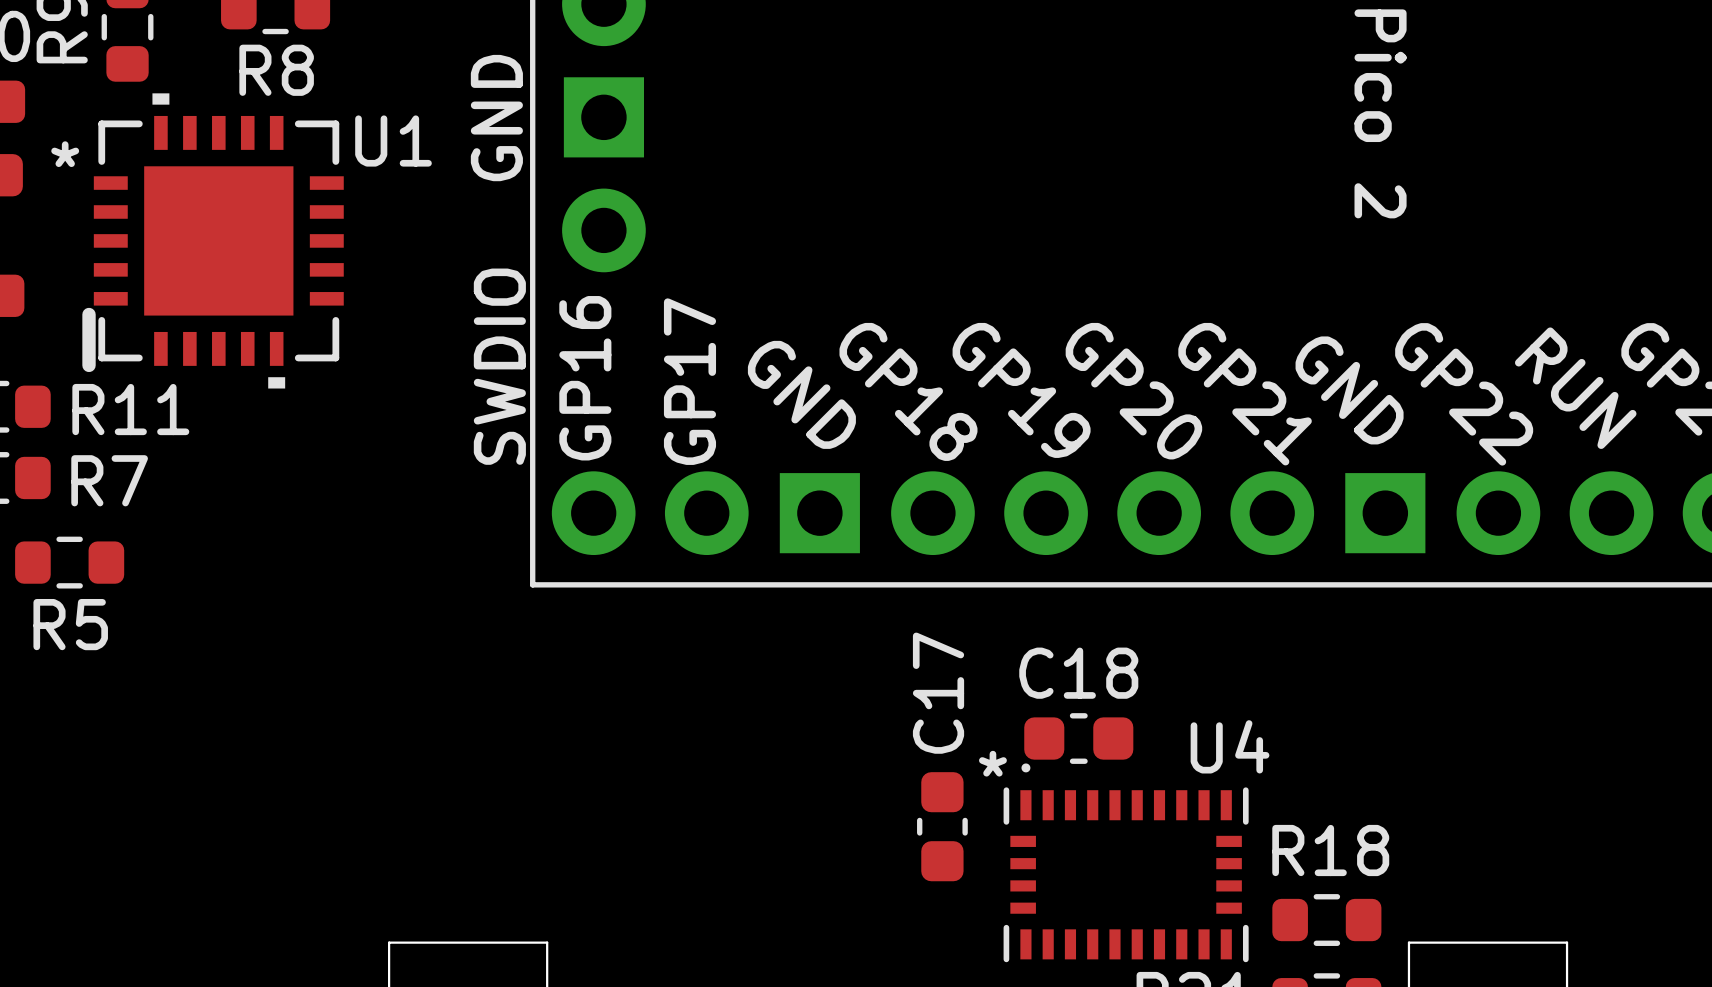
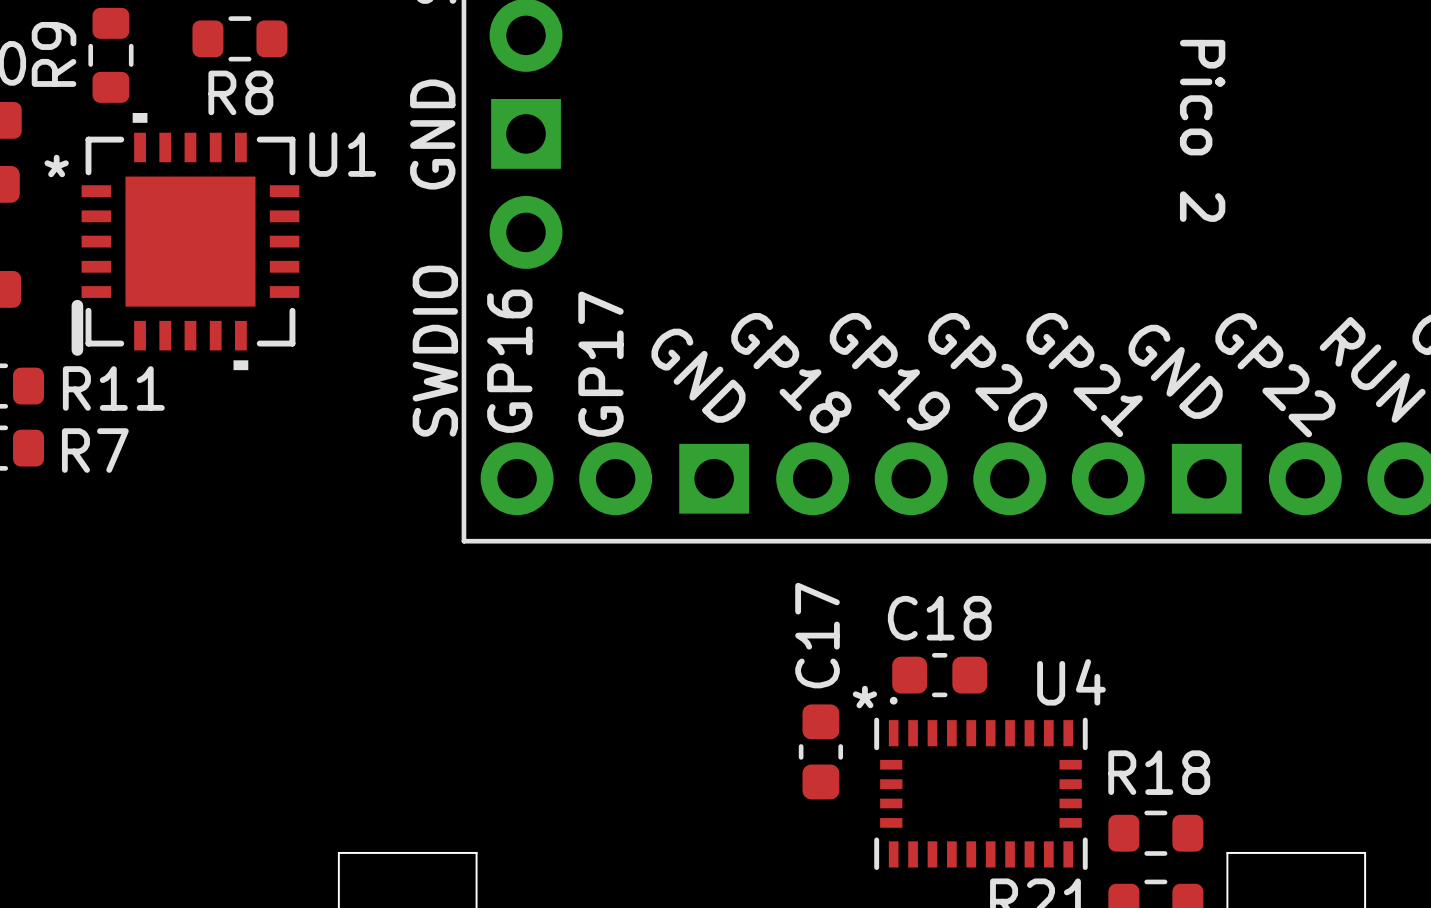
R5: (69, 562) -> none

